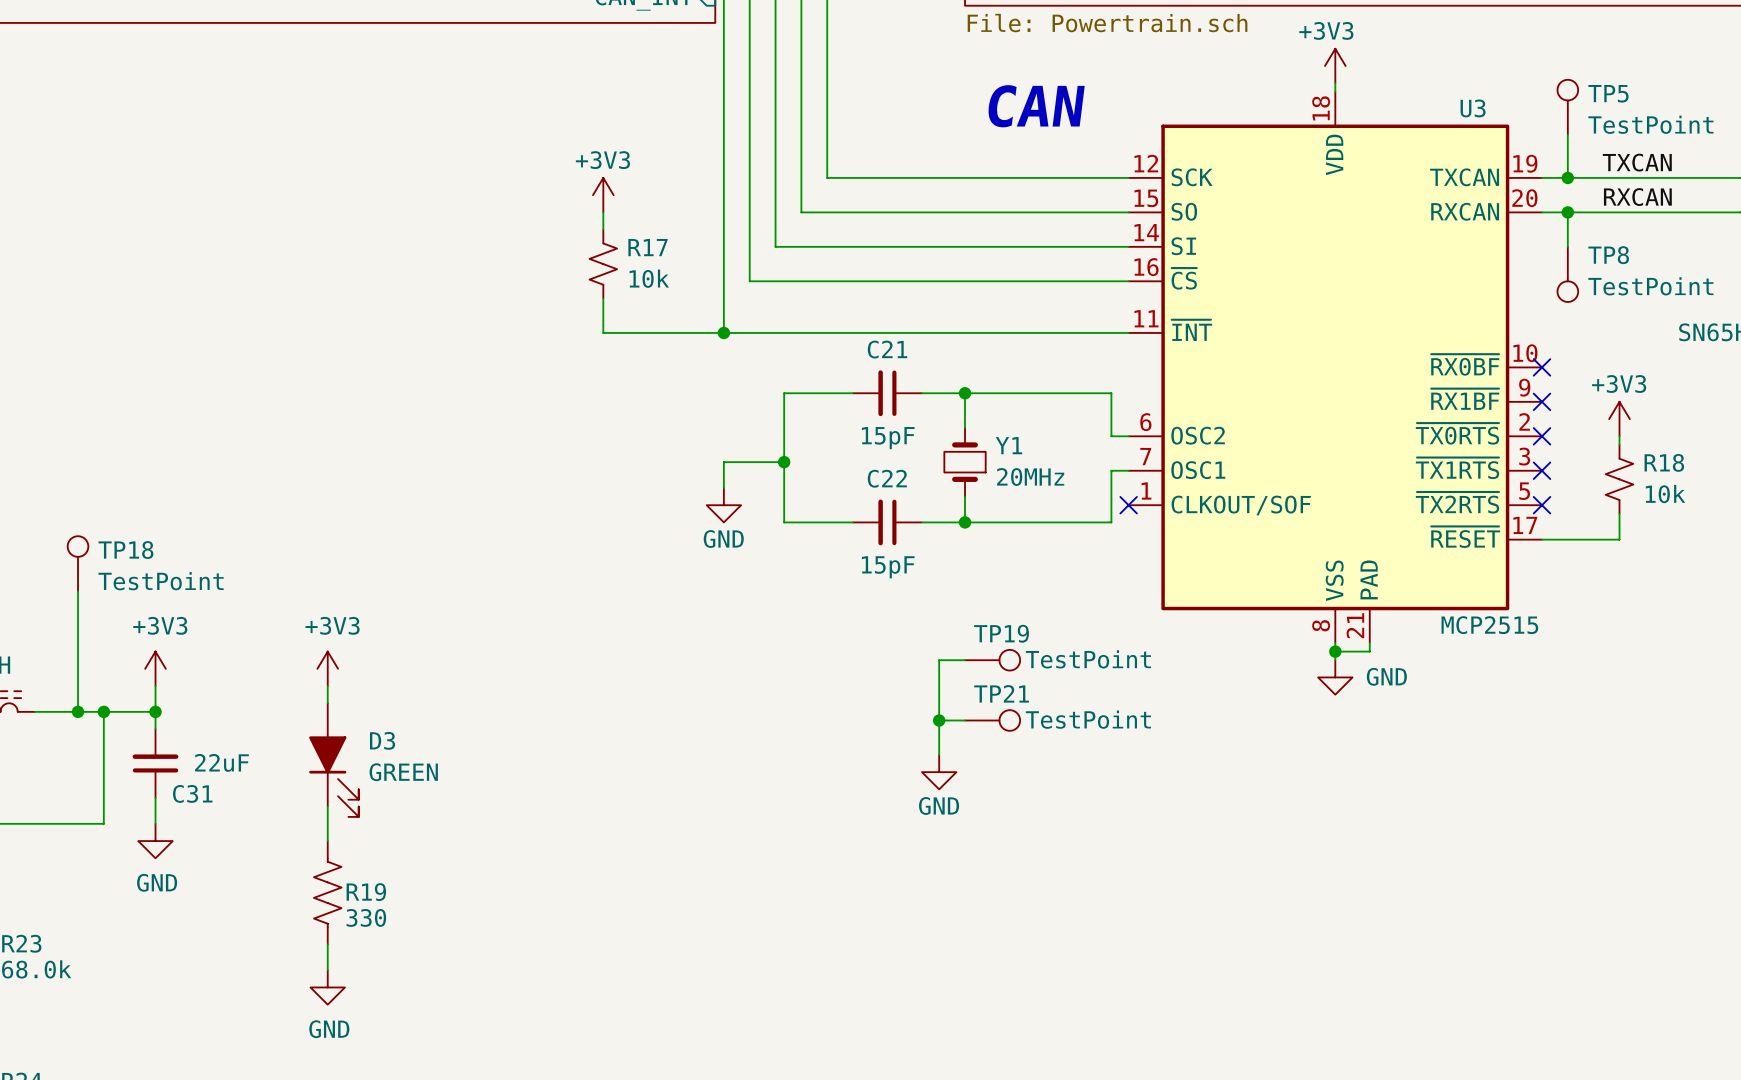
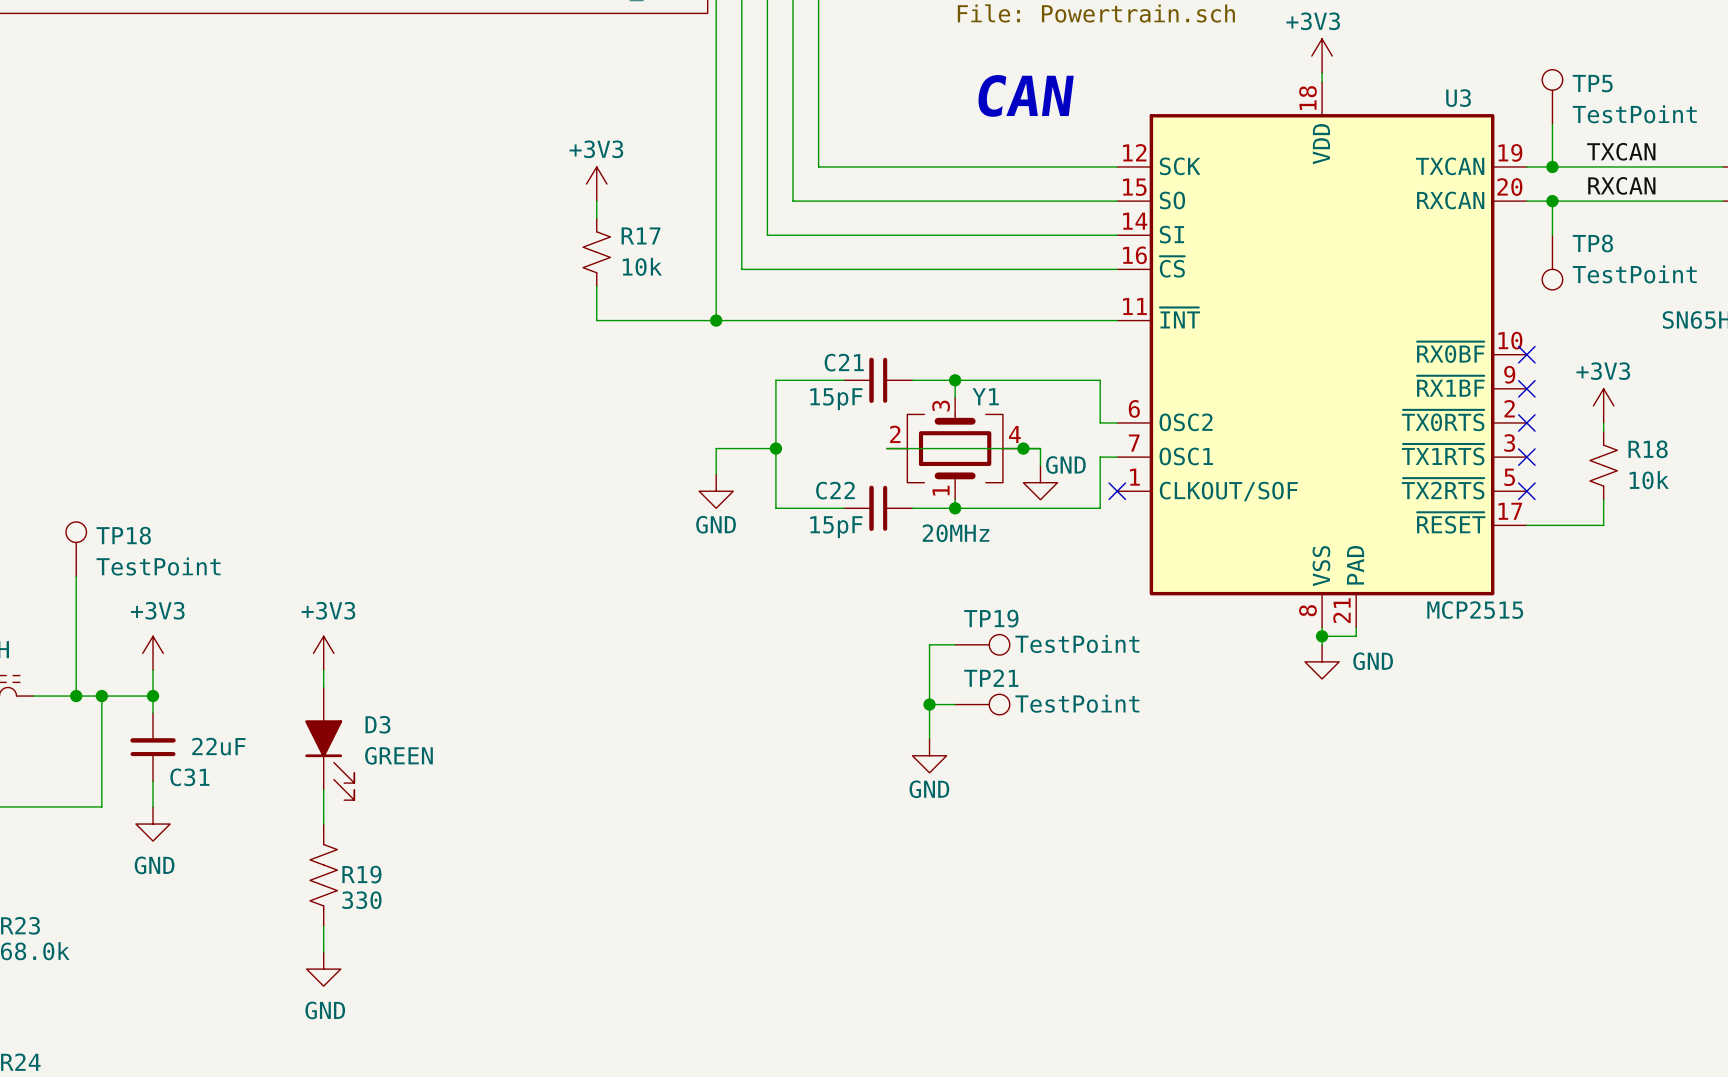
C21 name position: C21 (887, 349) -> C21 (844, 362)
Y1 symbol: [944, 427, 986, 497] -> [886, 397, 1024, 500]
C21 value position: 15pF (888, 438) -> 15pF (836, 399)
Y1 name position: Y1 (1008, 445) -> Y1 (985, 396)
wire: none -> (886, 448) (1040, 448) (1040, 465)
junction: none -> (1023, 448)
Y1 value position: 20MHz (1030, 477) -> 20MHz (956, 533)
C22 name position: C22 (887, 478) -> C22 (835, 490)
power symbol: none -> GND (1040, 482)
C22 value position: 15pF (888, 567) -> 15pF (836, 527)

